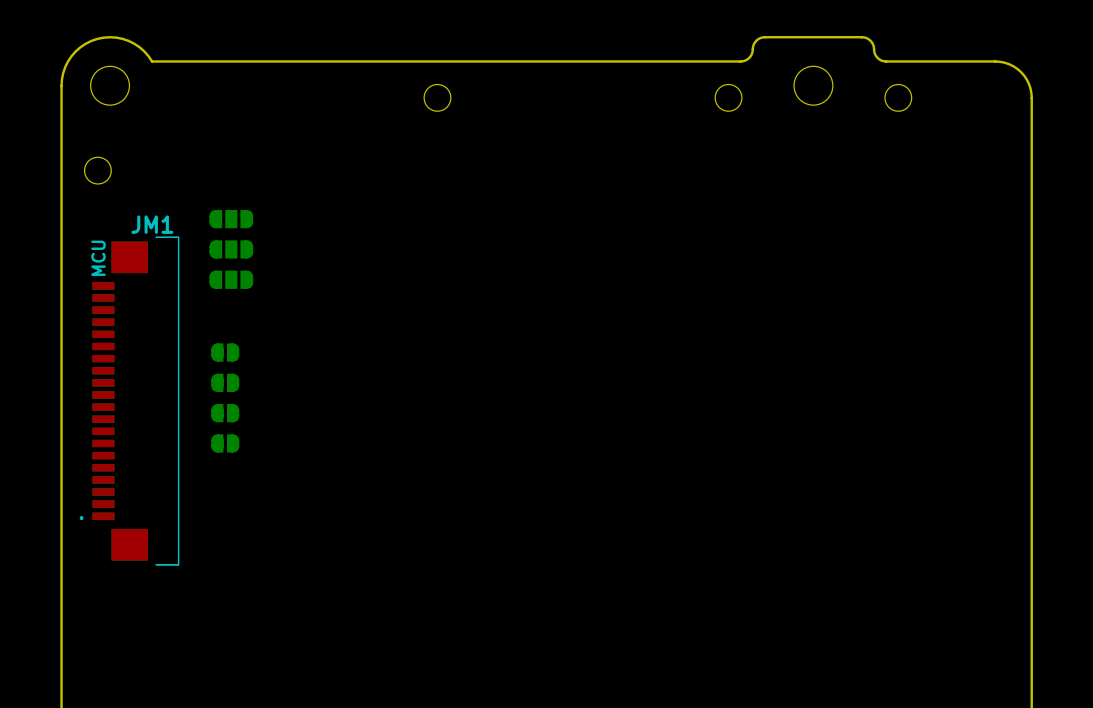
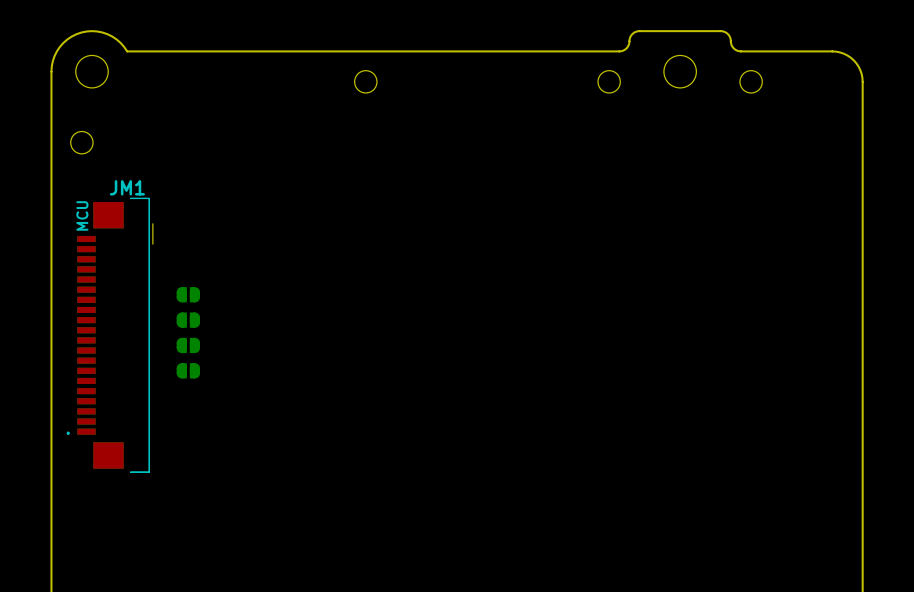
part: (231, 219) -> none
part: (231, 249) -> none
board edge: none -> (152, 223) (152, 244)
part: (231, 279) -> none

